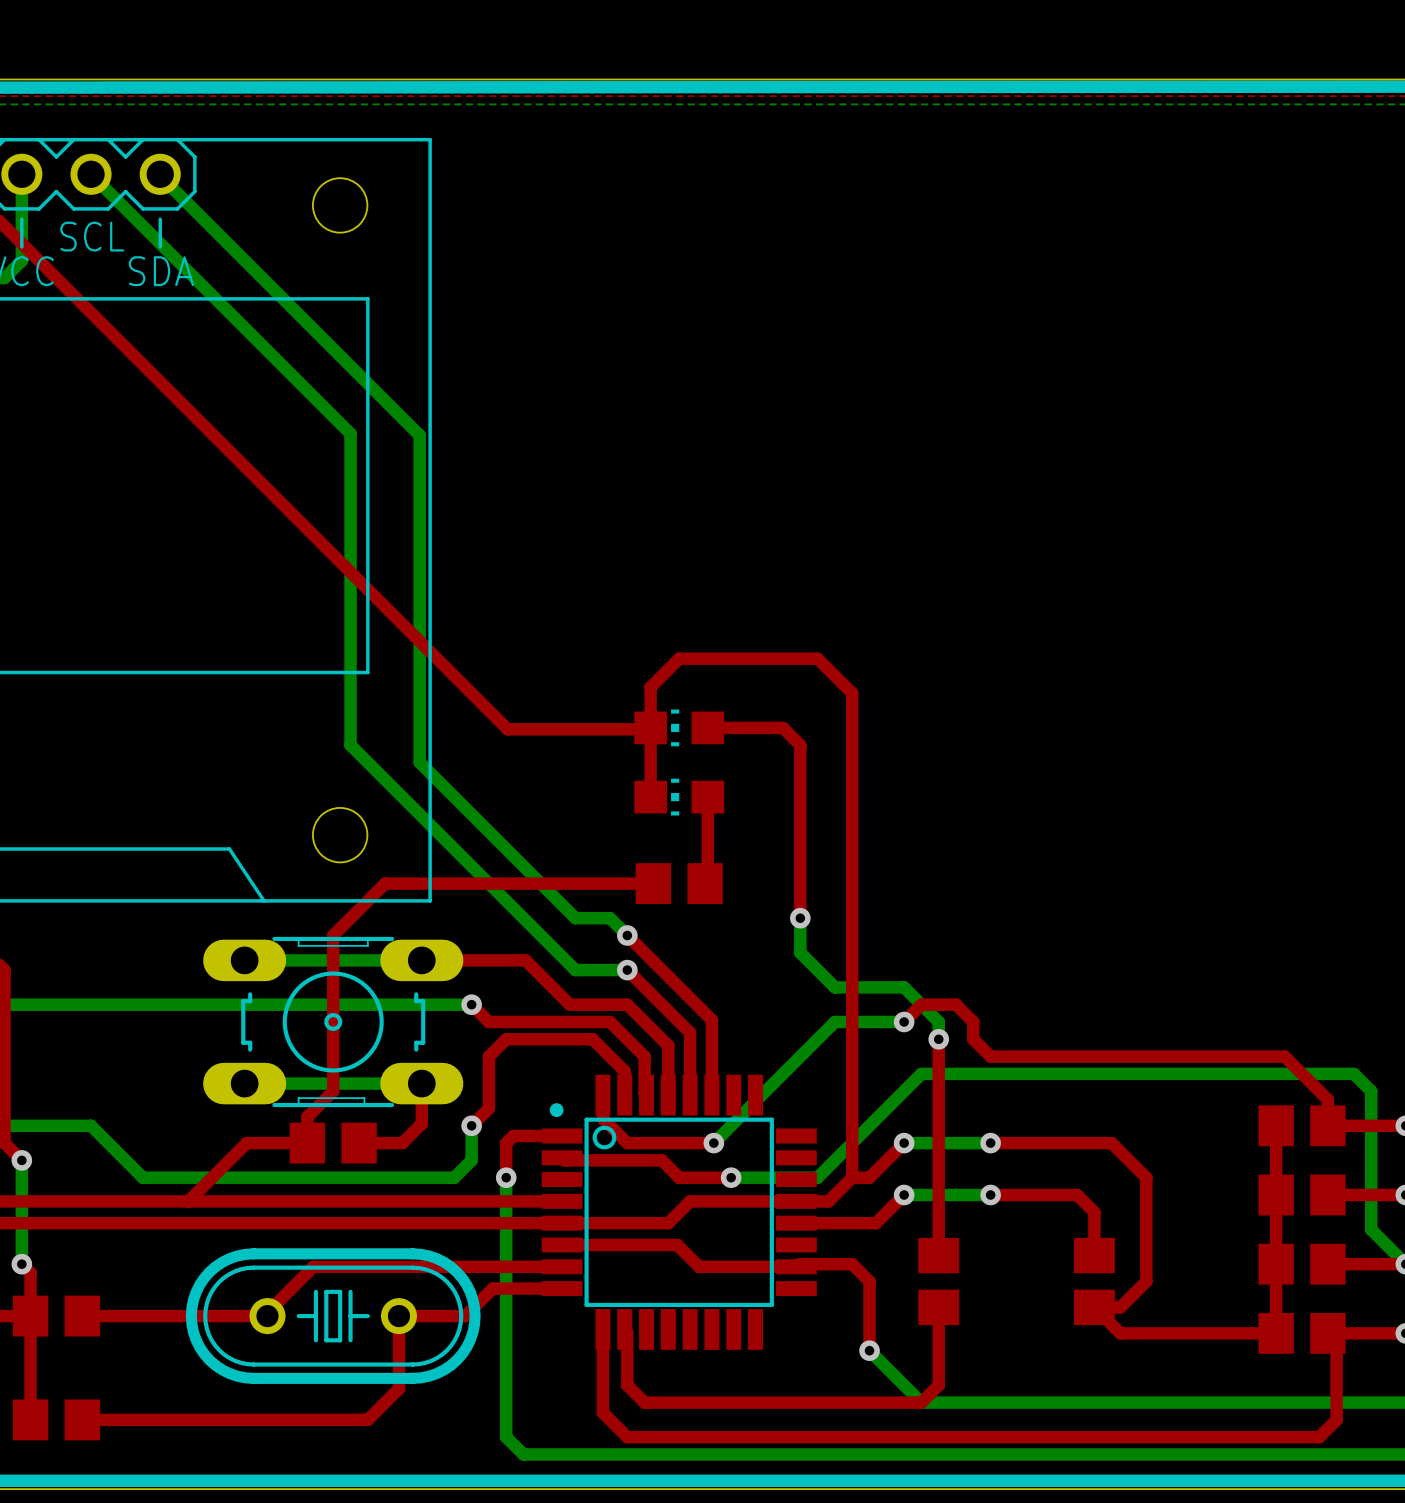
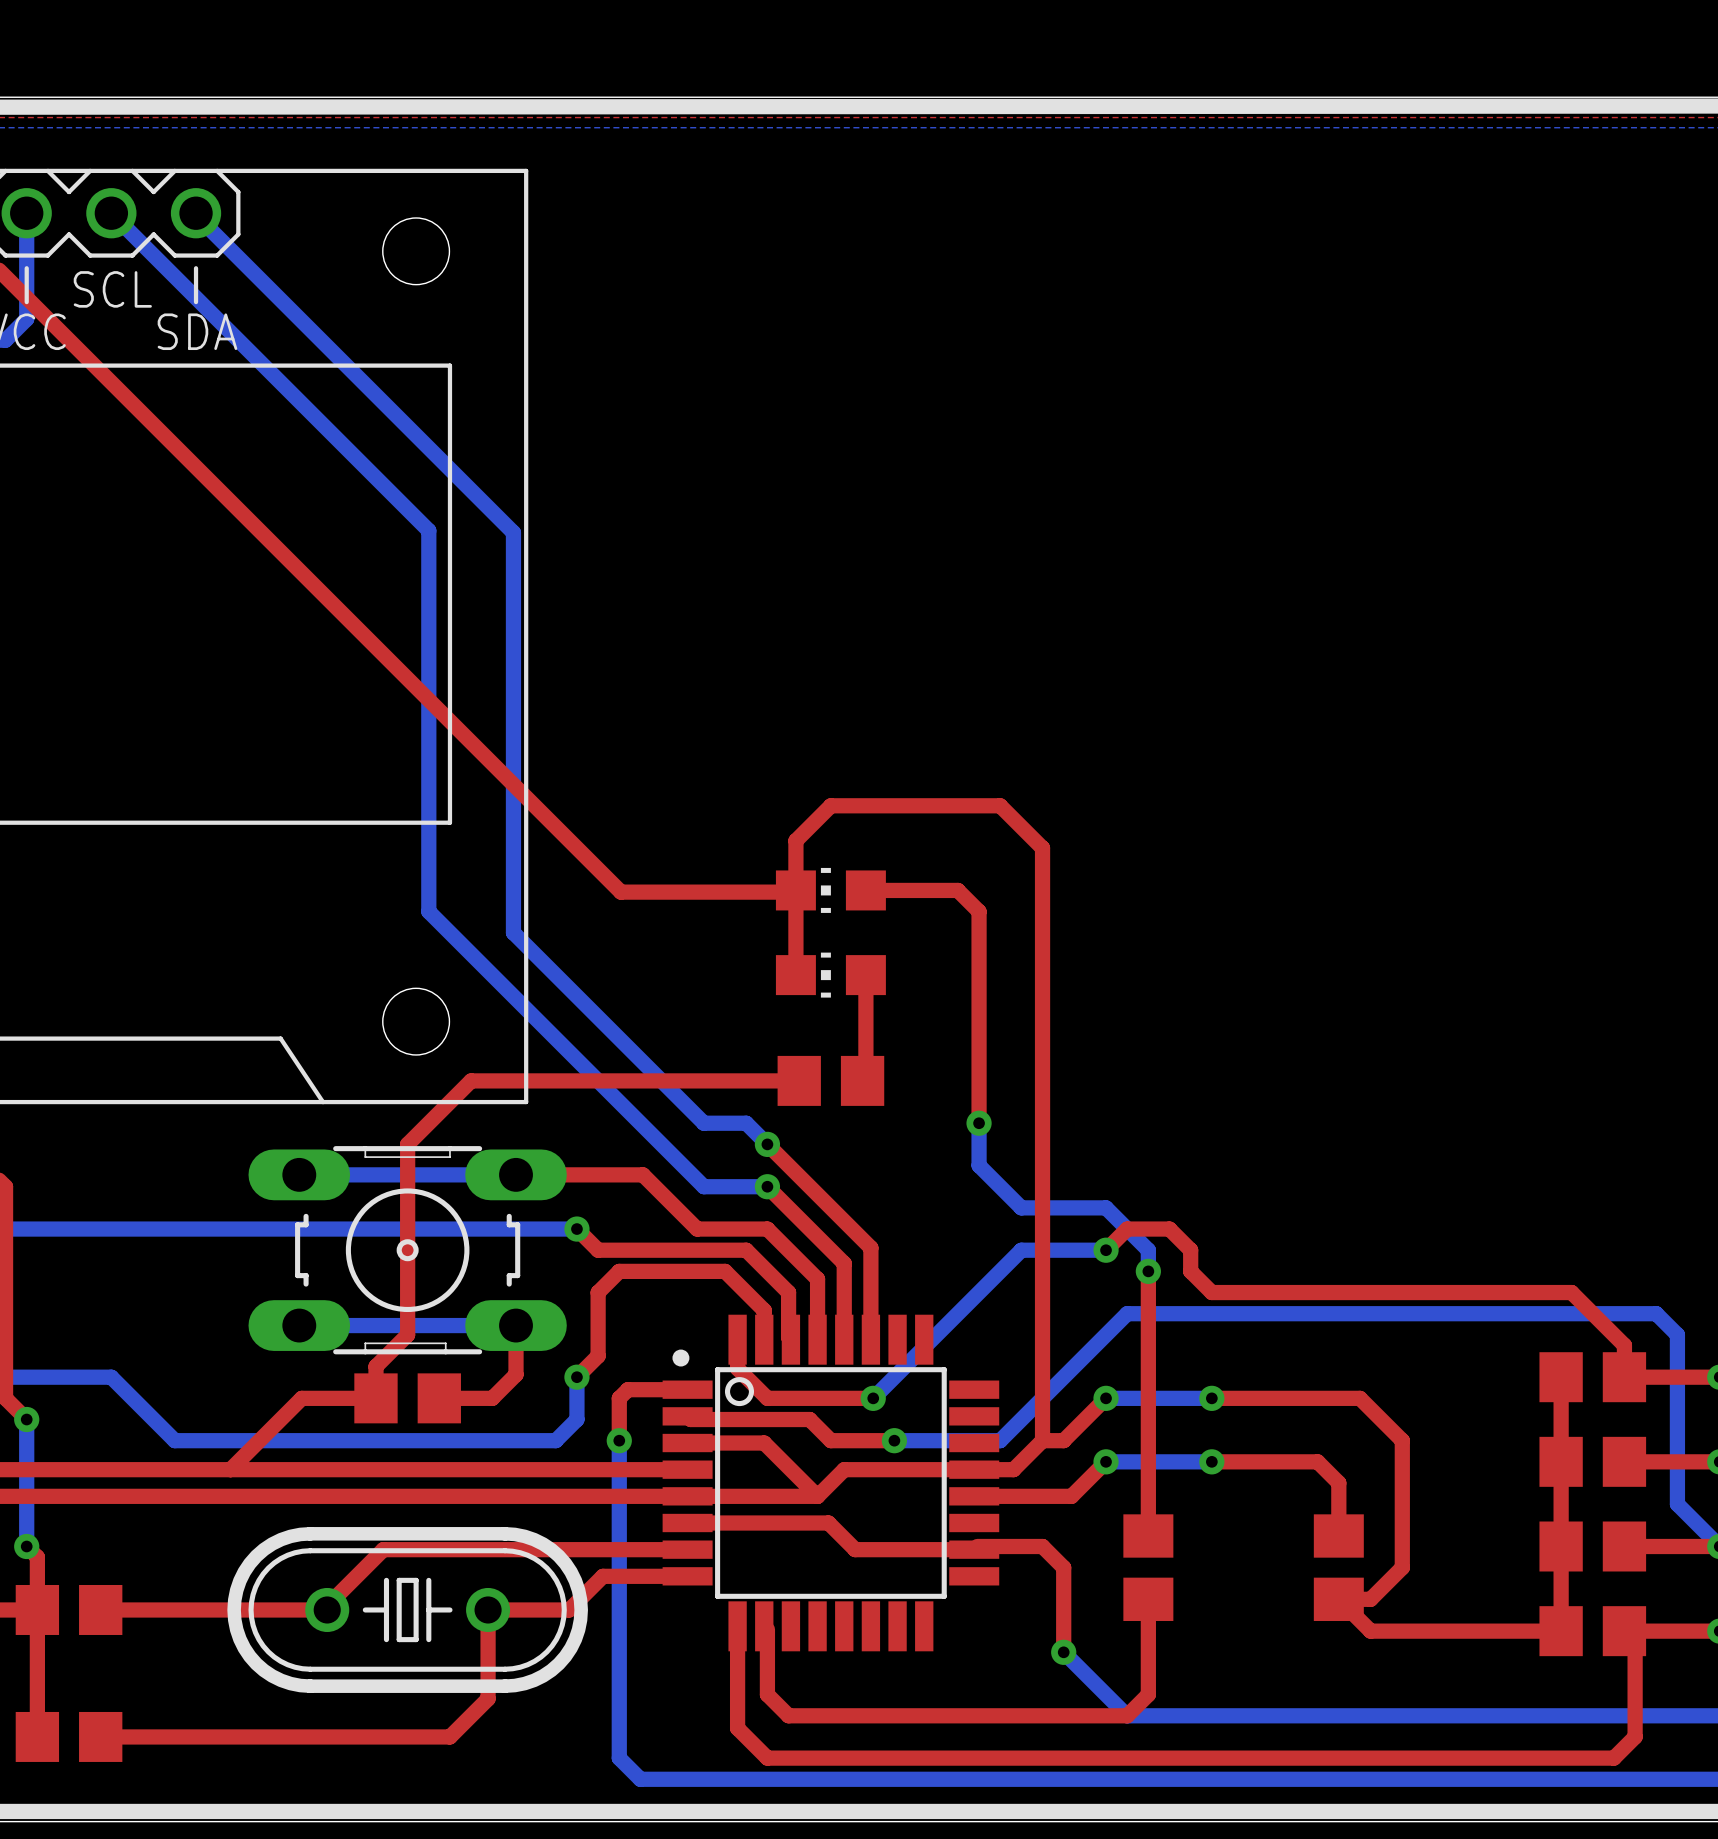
top track: none -> (687, 1443) (764, 1443) (817, 1496)

